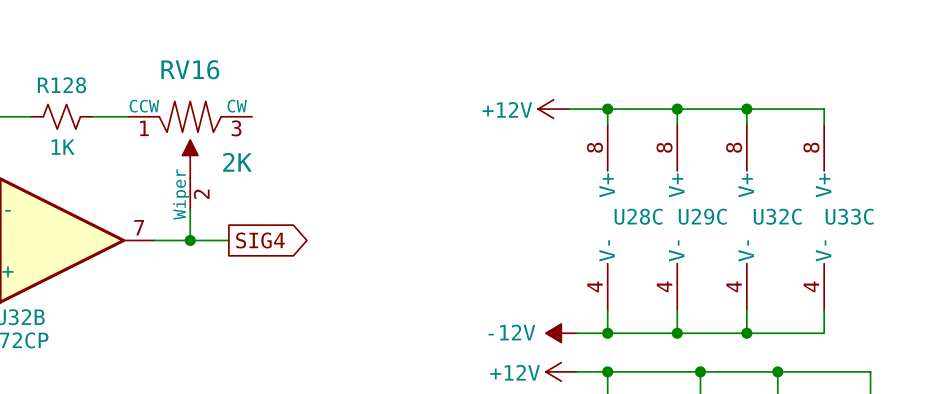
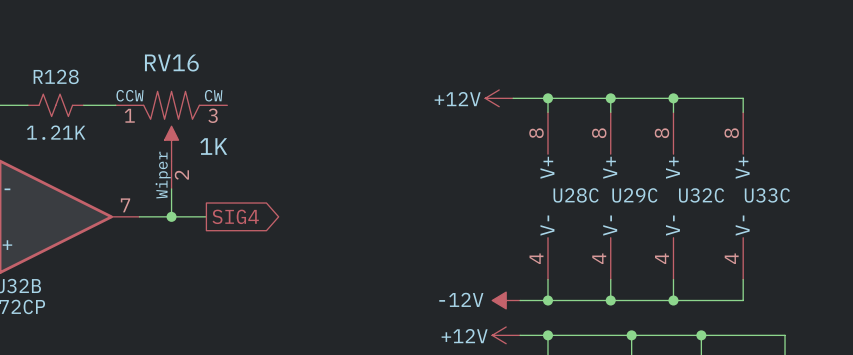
R128 value: 1K (63, 147) -> 1.21K (56, 132)
RV16 value: 2K (237, 162) -> 1K (213, 146)

